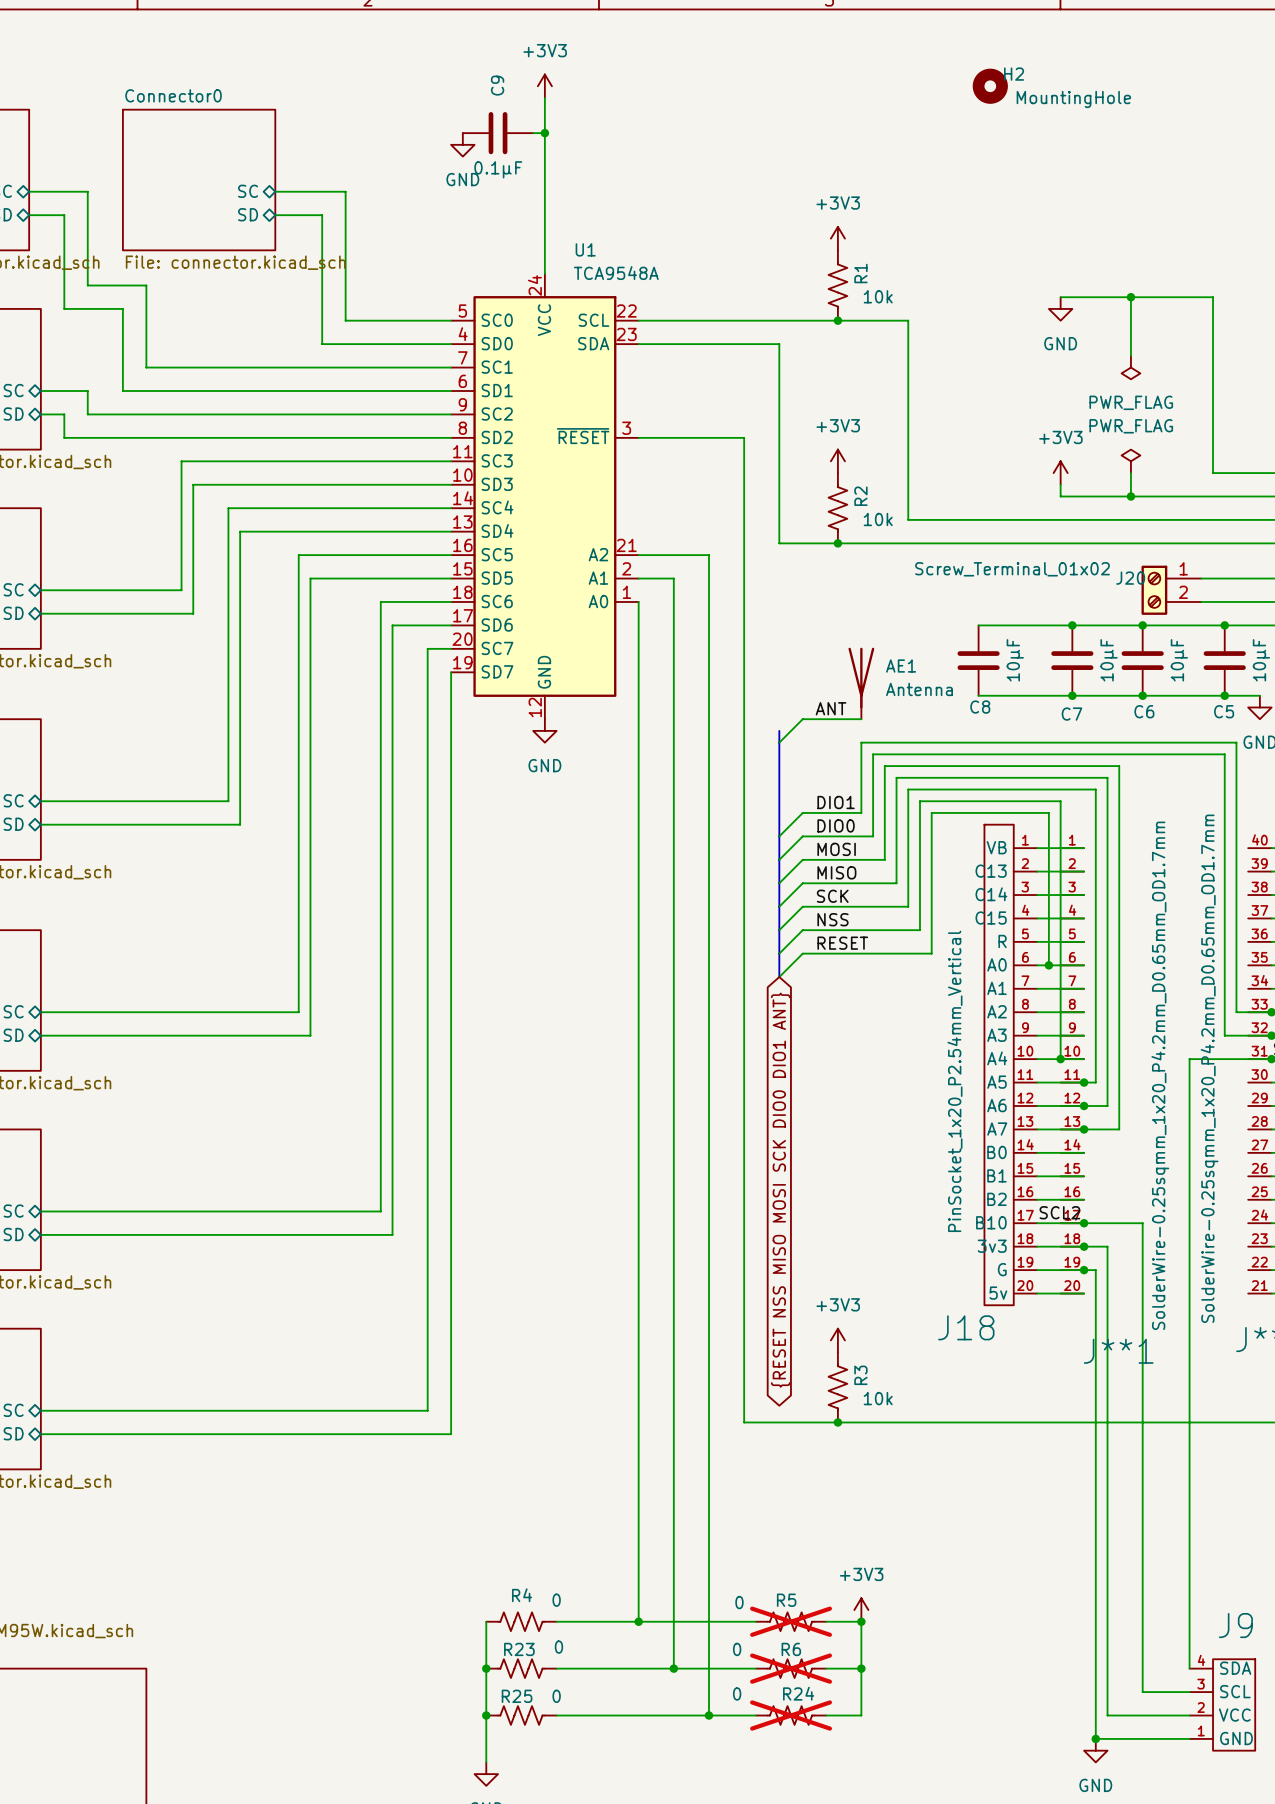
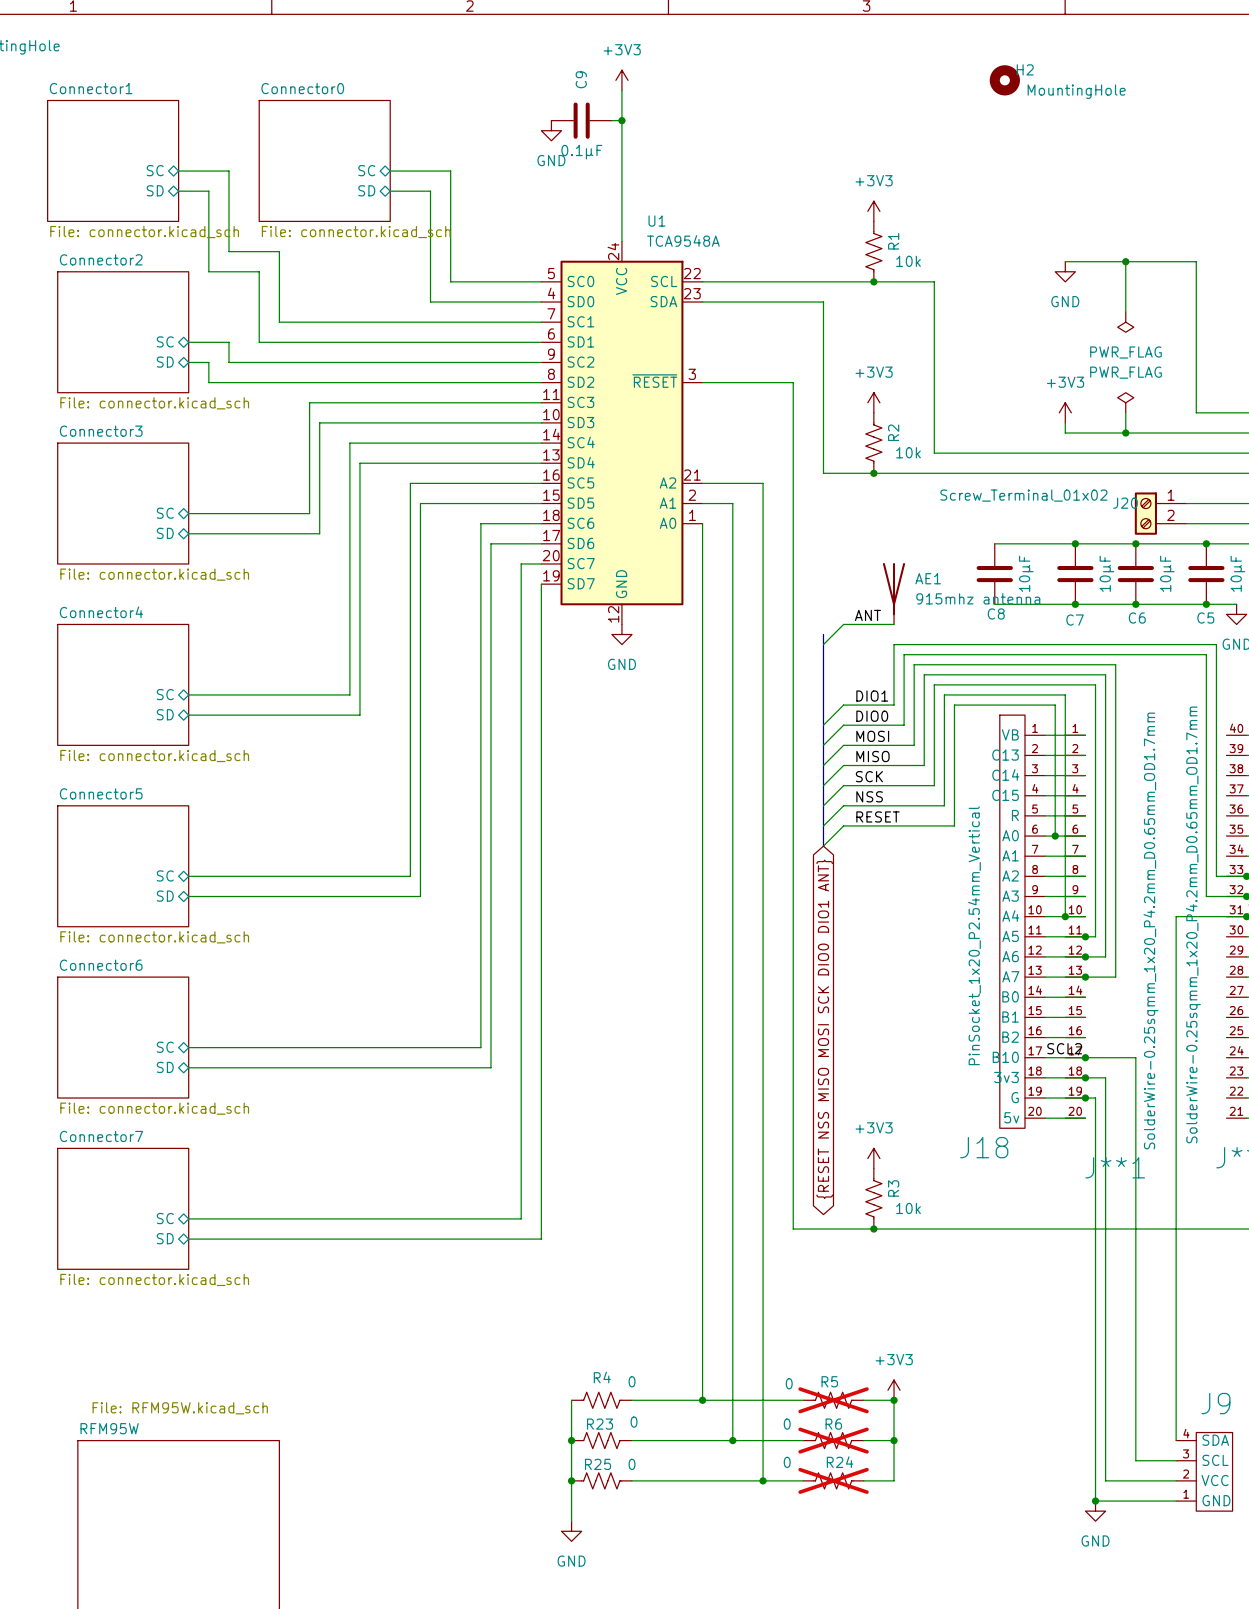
AE1 value: Antenna (919, 689) -> 915mhz antenna (978, 598)

